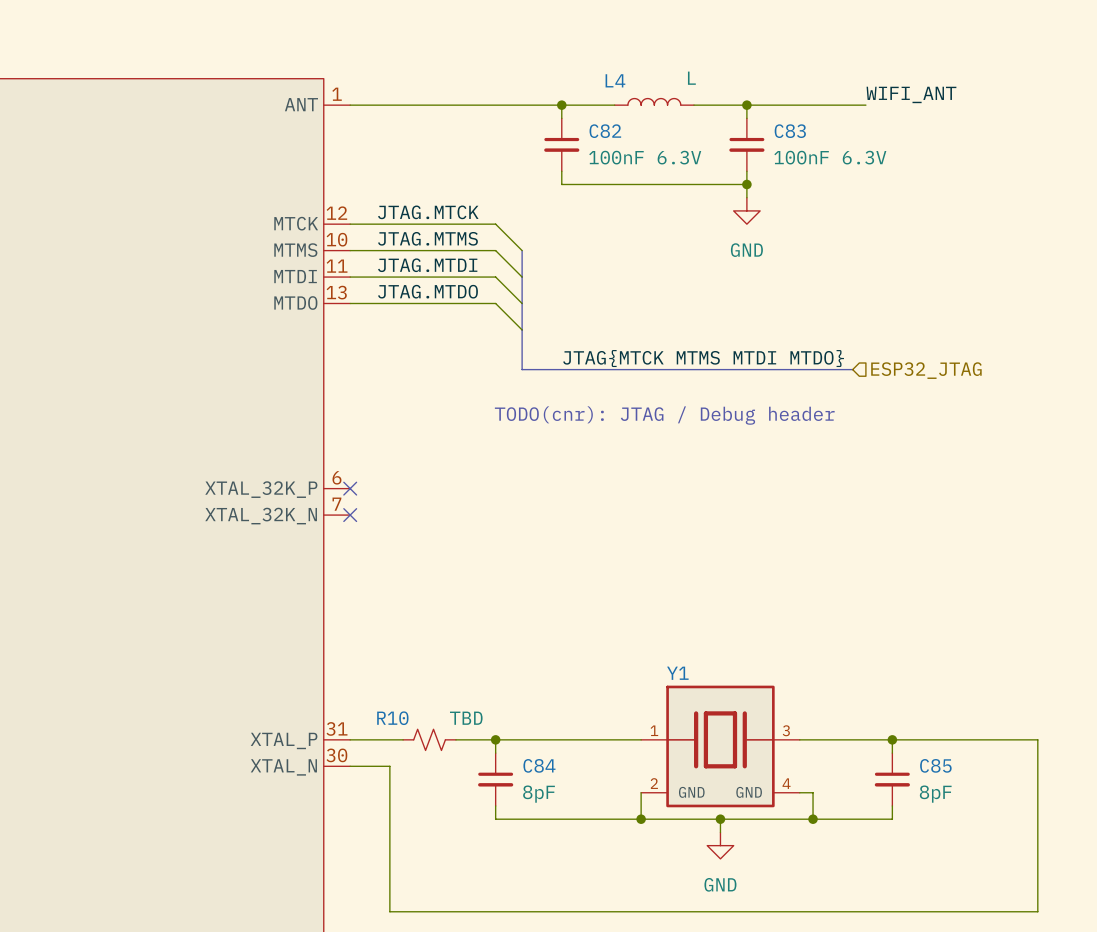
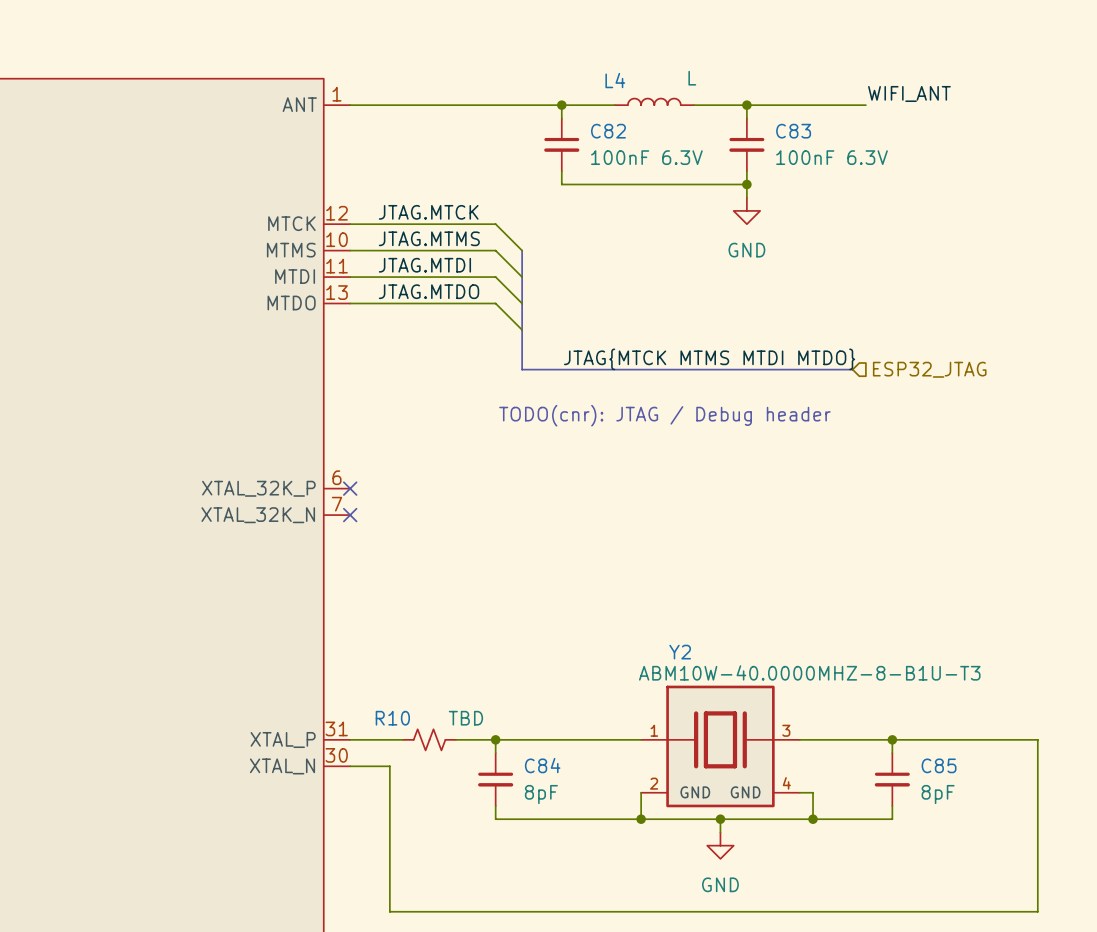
Y1 name: Y1 (677, 673) -> Y2 (680, 652)
Y1 value: none -> ABM10W-40.0000MHZ-8-B1U-T3 (809, 672)

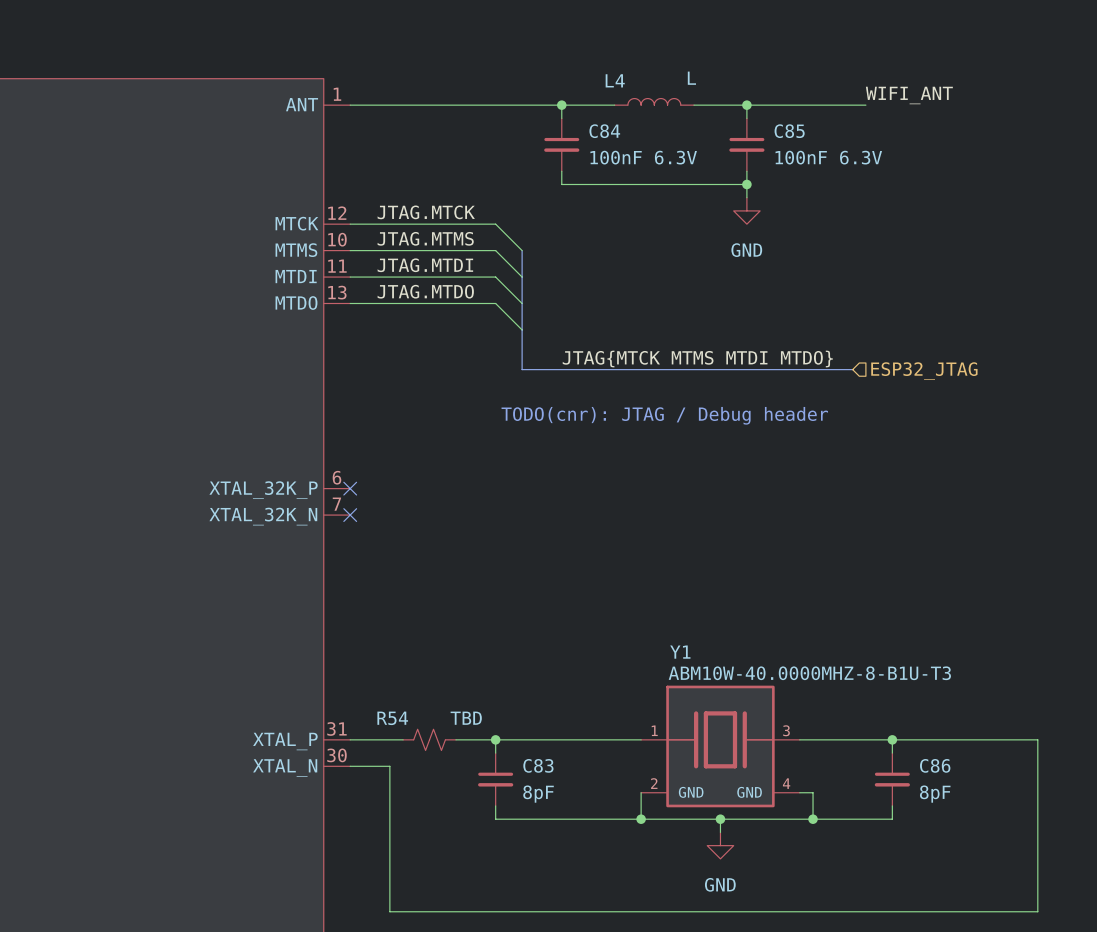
C82 name: C82 (608, 131) -> C84 (604, 131)
C83 name: C83 (793, 131) -> C85 (789, 131)
Y2 name: Y2 (680, 652) -> Y1 (680, 652)
R10 name: R10 (392, 718) -> R54 (392, 718)
C84 name: C84 (542, 765) -> C83 (538, 765)
C85 name: C85 (939, 765) -> C86 (935, 765)

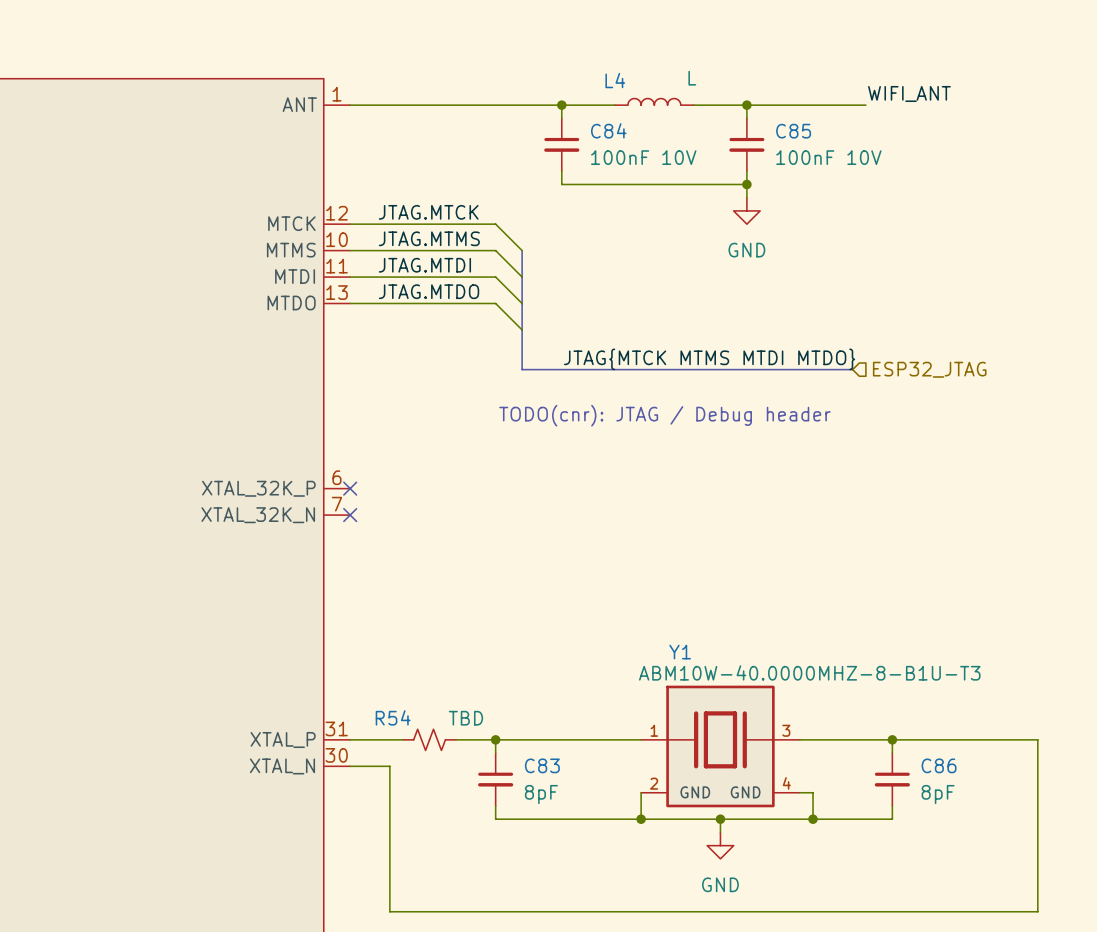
C84 value: 100nF 6.3V (643, 157) -> 100nF 10V (643, 157)
C85 value: 100nF 6.3V (828, 157) -> 100nF 10V (828, 157)

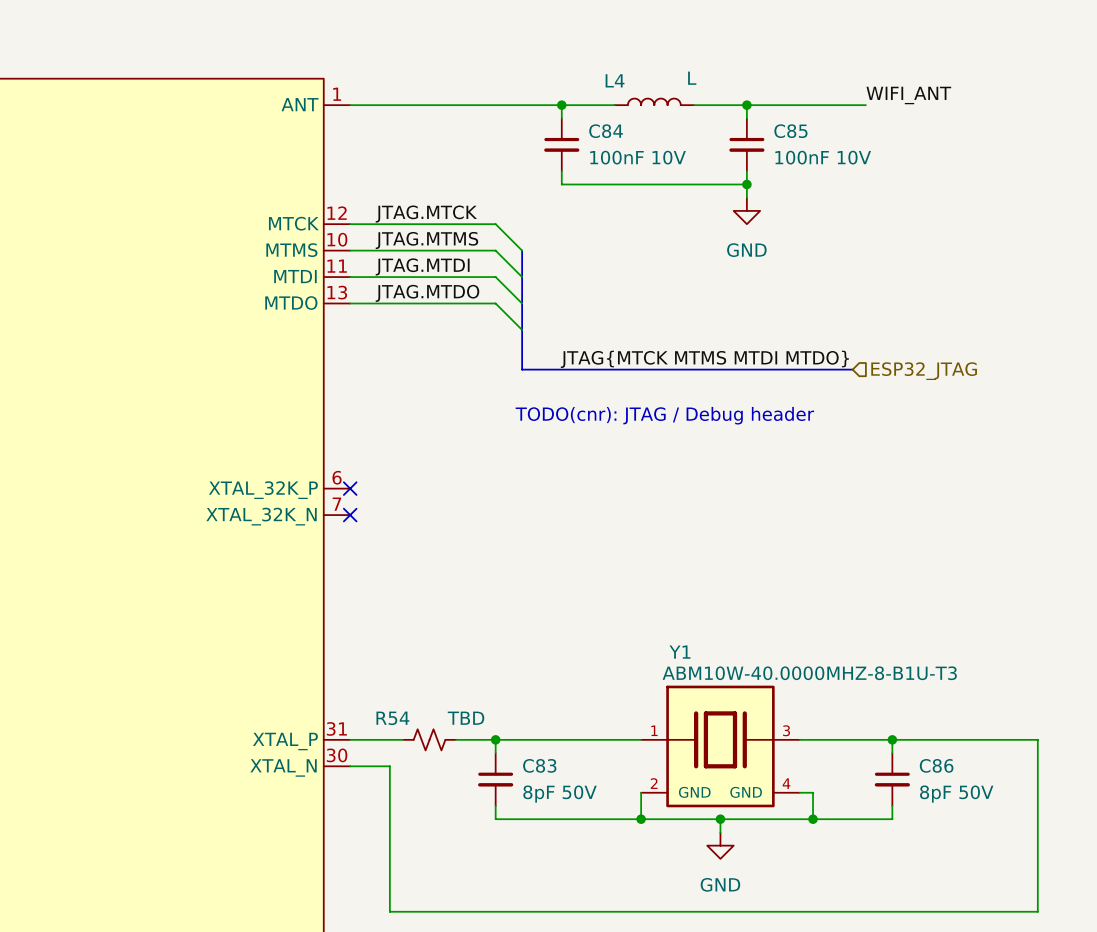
C83 value: 8pF (541, 794) -> 8pF 50V (560, 794)
C86 value: 8pF (938, 794) -> 8pF 50V (956, 794)

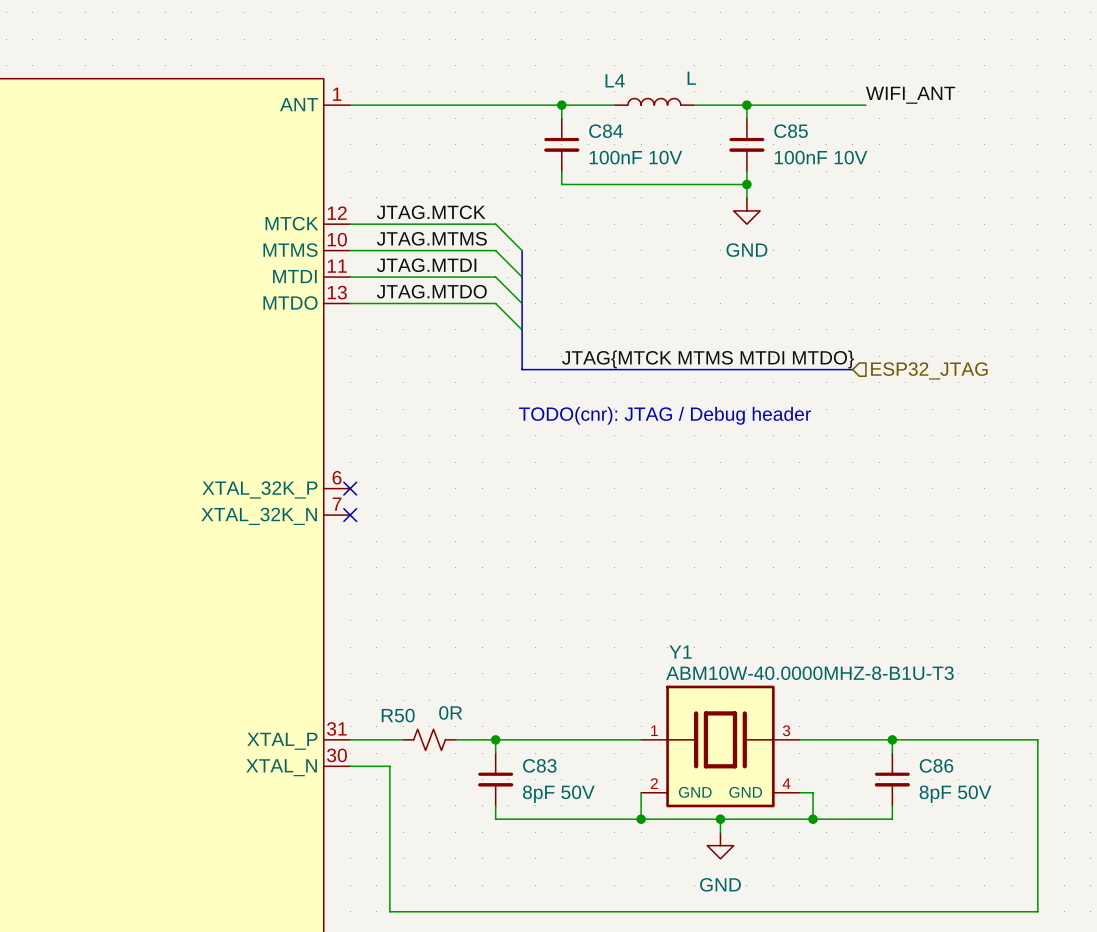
R54 name: R54 (392, 718) -> R50 (398, 715)
R54 value: TBD (466, 718) -> 0R (450, 712)

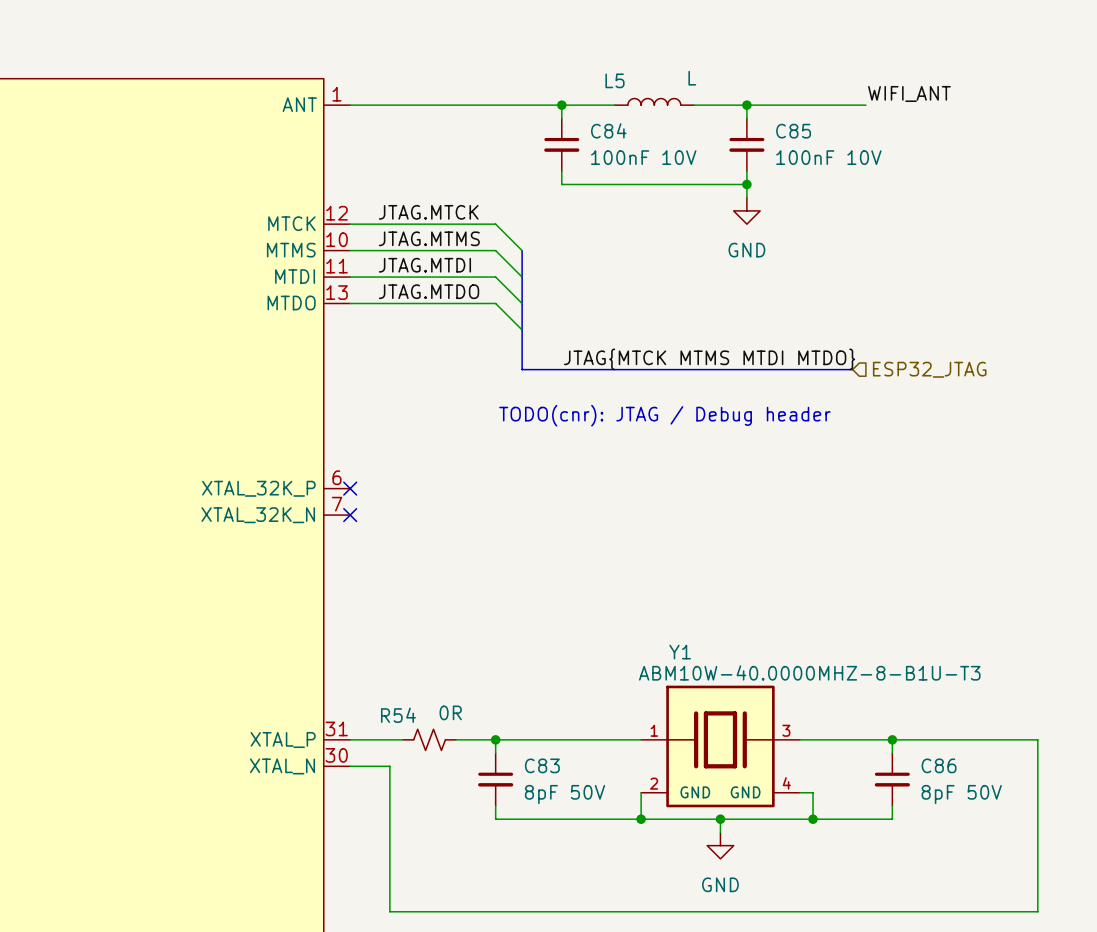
L4 name: L4 (615, 80) -> L5 (614, 80)
R50 name: R50 (398, 715) -> R54 (398, 715)

